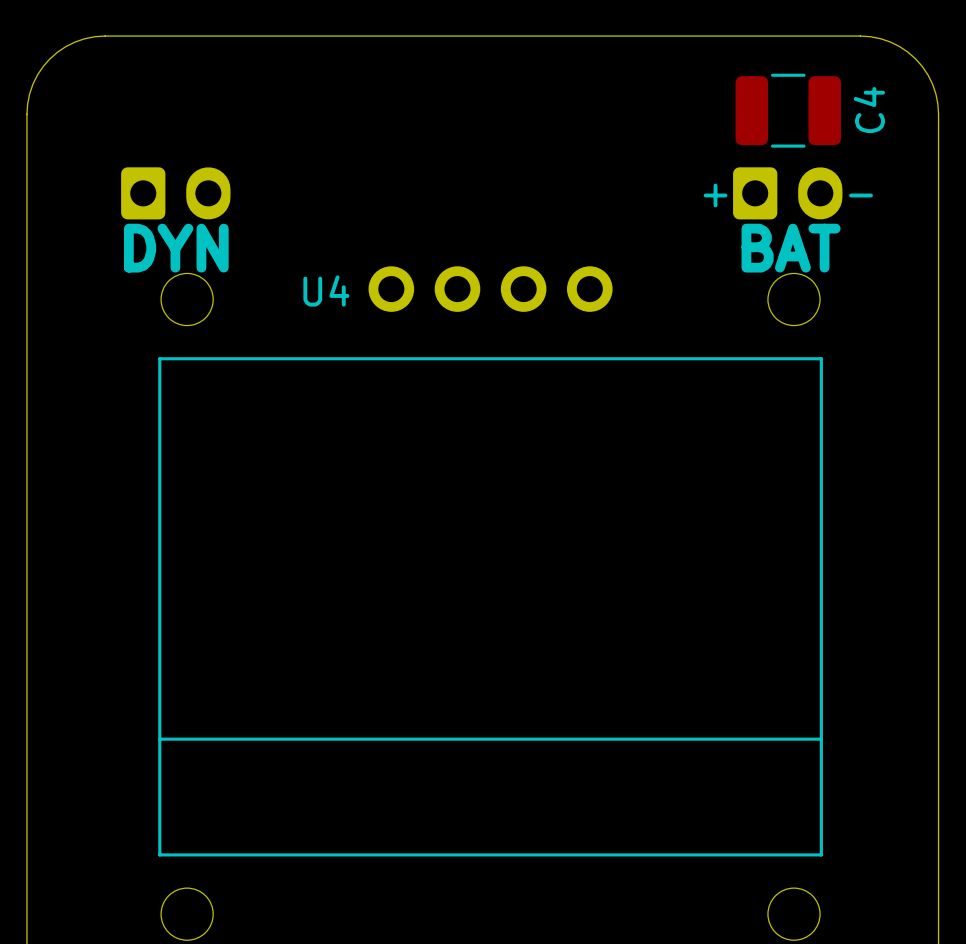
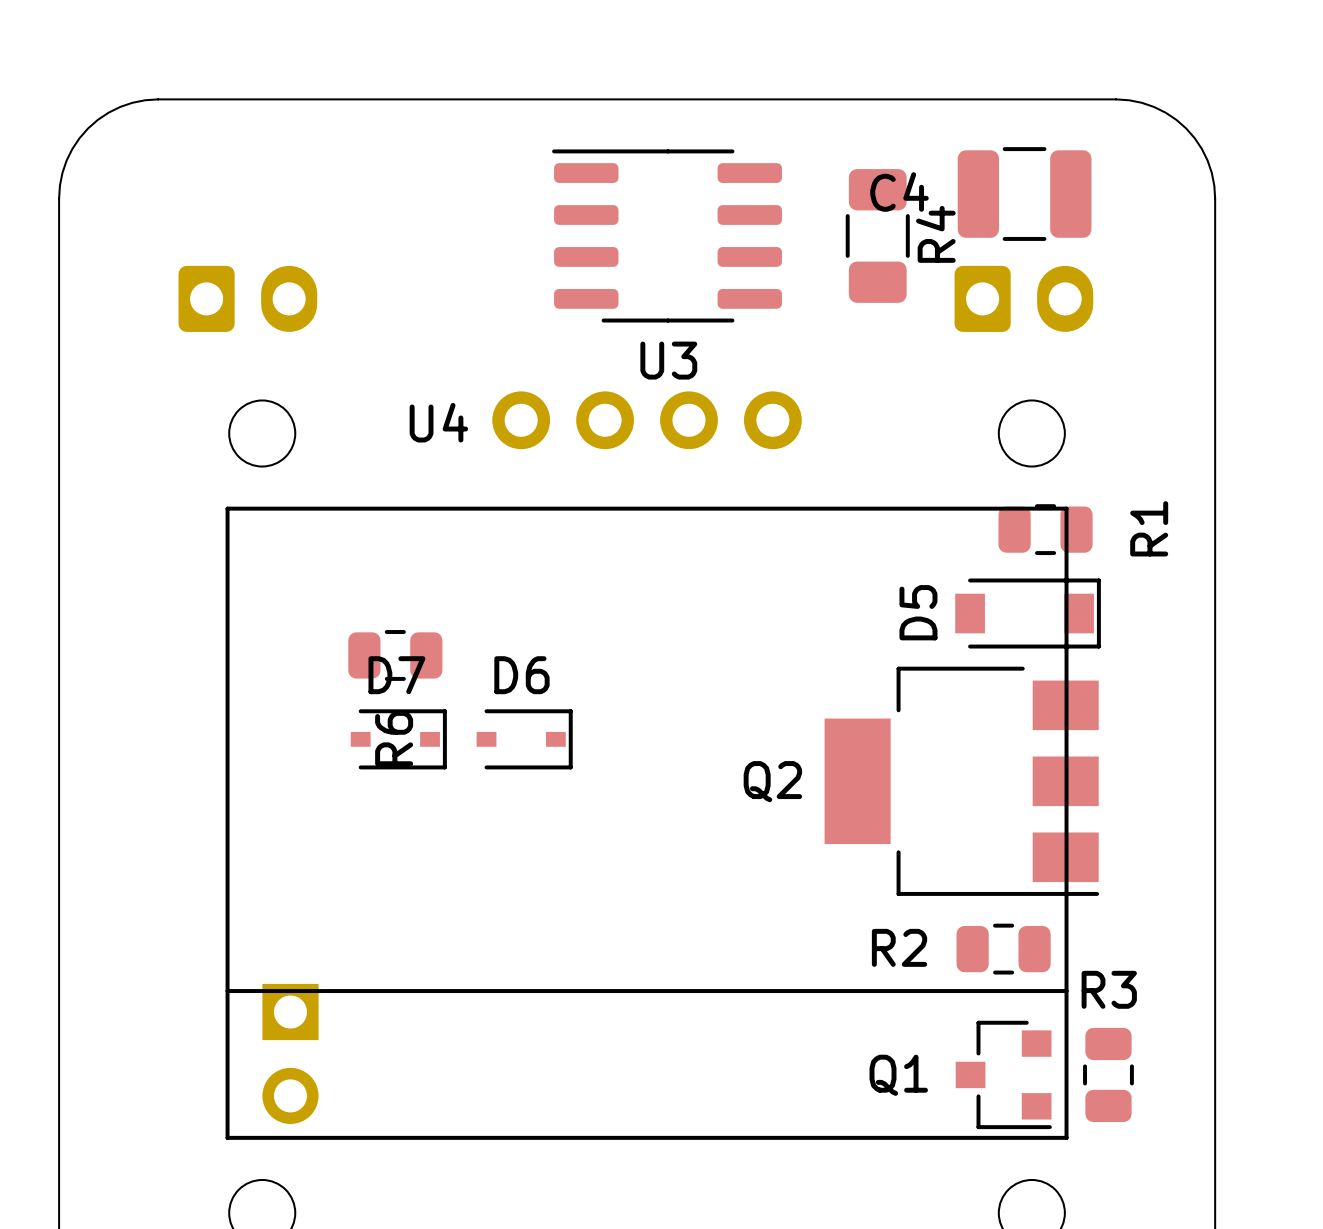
C4 name rotation: 0° (869, 110) -> 90° clockwise (899, 192)
C4 name position: C4 (869, 110) -> C4 (899, 192)
U3: none -> (667, 235)
R4: none -> (877, 235)
text: + (715, 195) -> none
text: - (861, 195) -> none
text: DYN (176, 248) -> none
text: BAT (791, 248) -> none
R1: none -> (1045, 529)
D5: none -> (1028, 613)
R6: none -> (395, 655)
D7: none -> (398, 739)
D6: none -> (524, 739)
Q2: none -> (961, 781)
R2: none -> (1003, 949)
part: none -> (290, 1053)
Q1: none -> (1003, 1074)
R3: none -> (1108, 1074)

